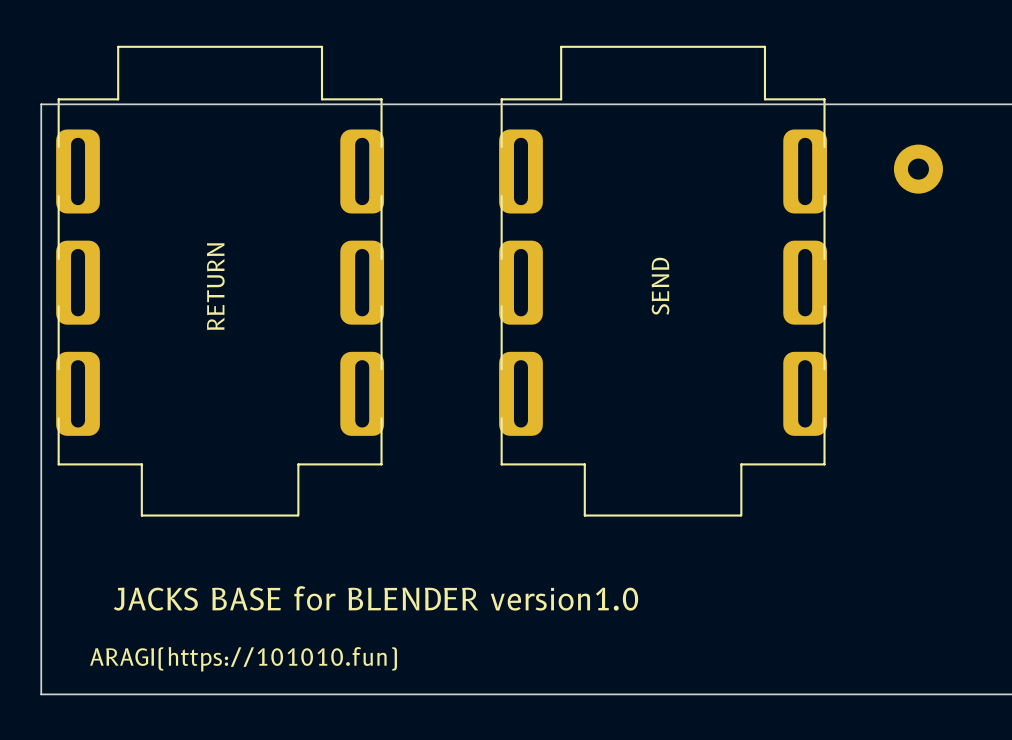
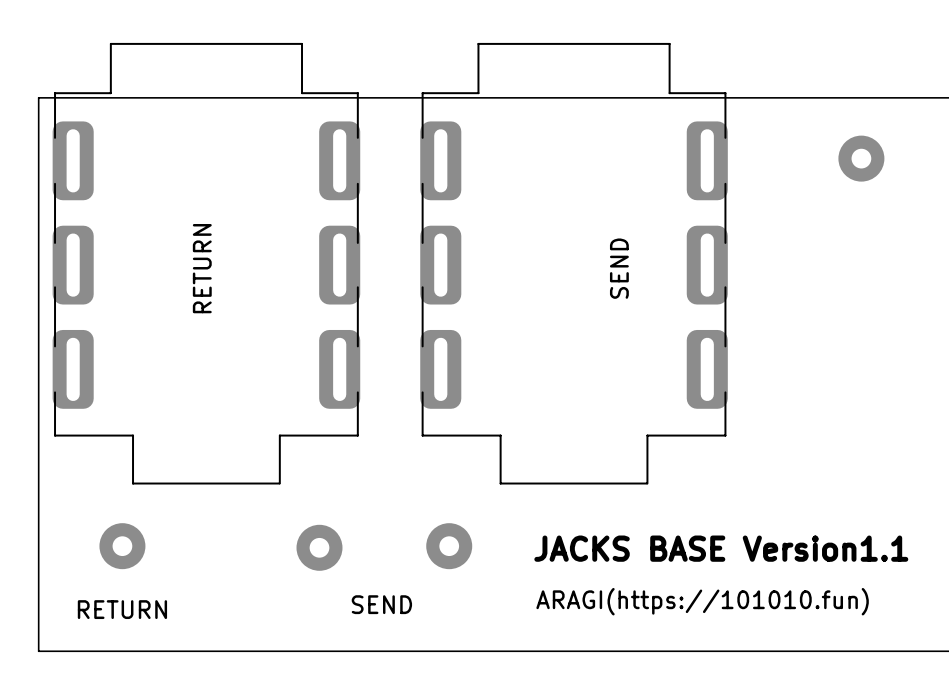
part position: (663, 281) -> (574, 263)
part: none -> (122, 546)
part: none -> (449, 546)
part: none -> (319, 547)
text: JACKS BASE for BLENDER version1.0 (375, 598) -> JACKS BASE Version1.1 (721, 548)
text: none -> ARAGI(https://101010.fun) (702, 601)
text: none -> SEND (381, 604)
text: none -> RETURN (122, 609)
text: ARAGI(https://101010.fun) (243, 659) -> none

